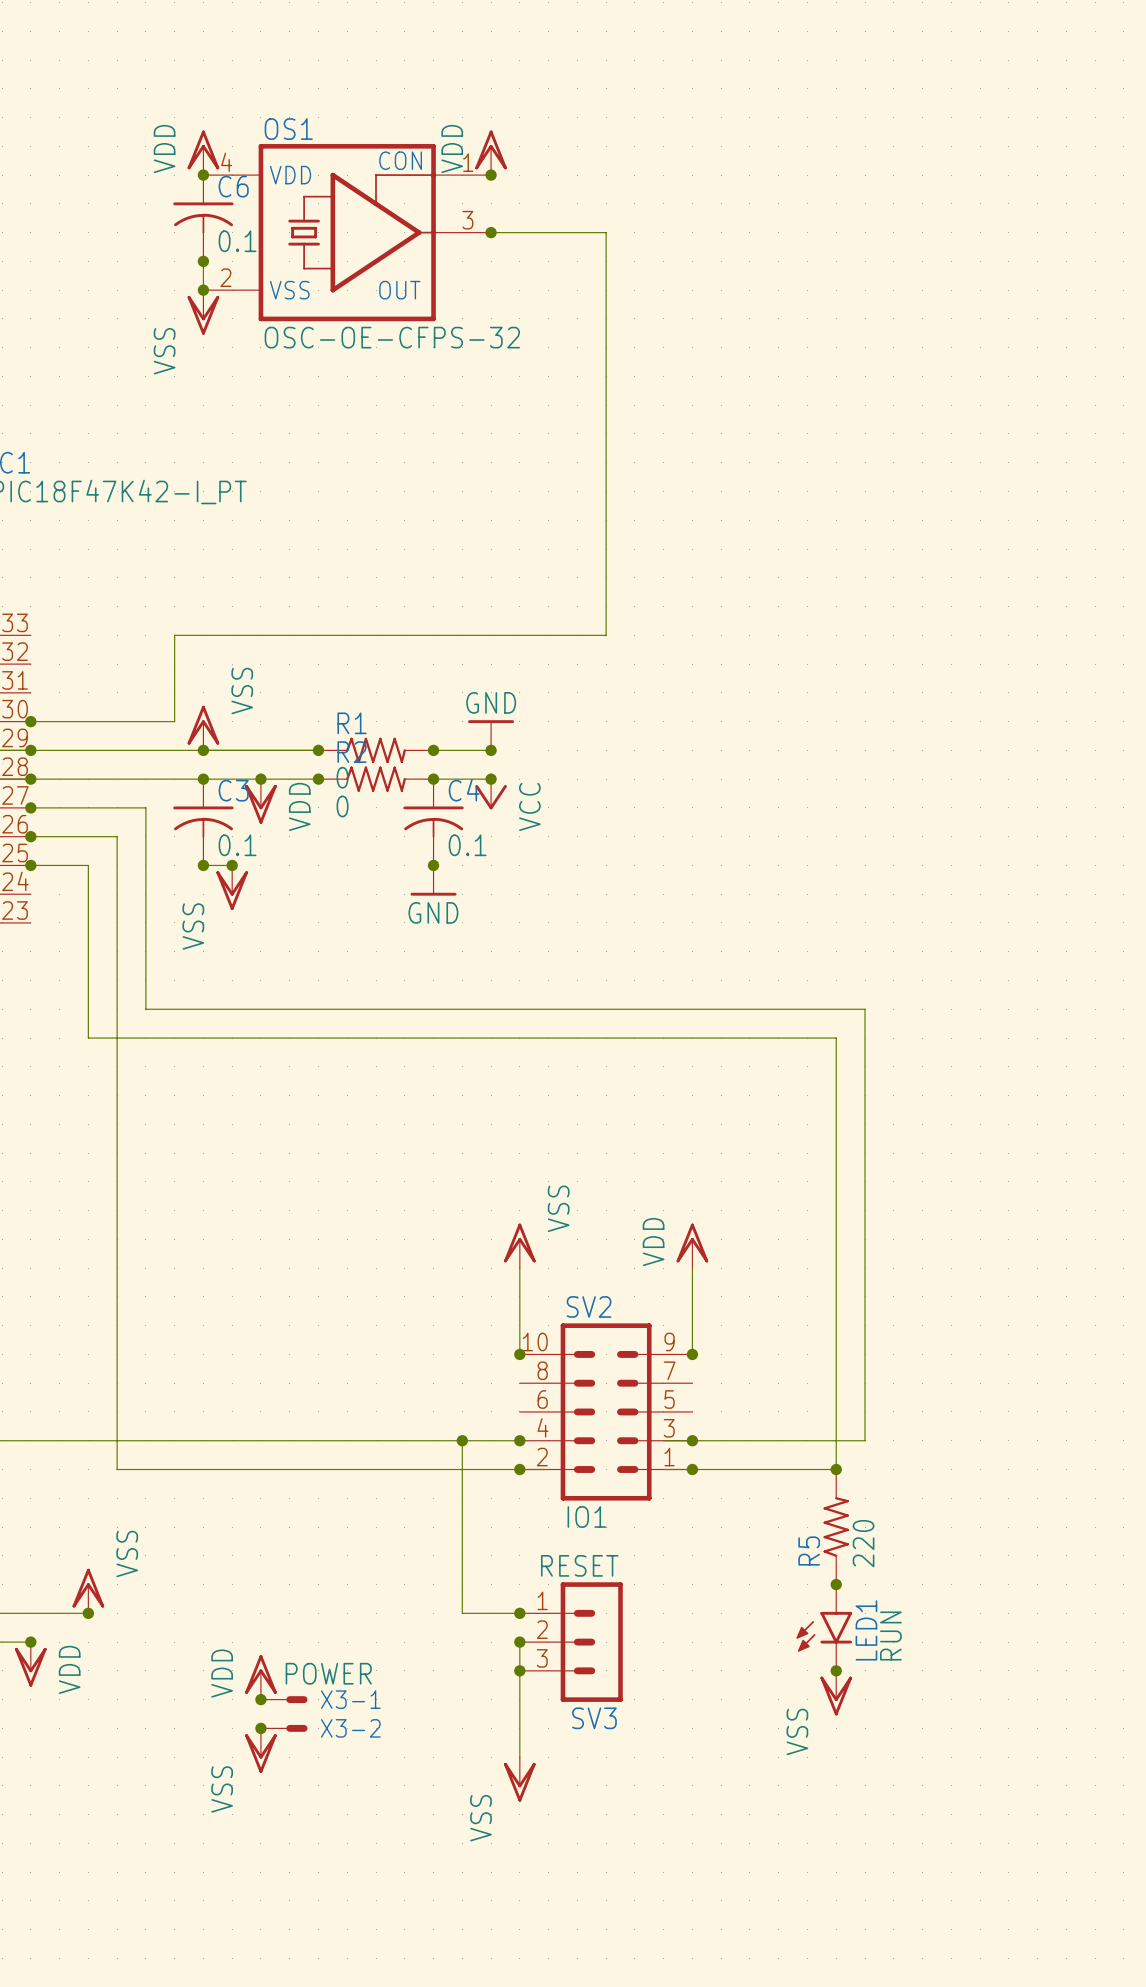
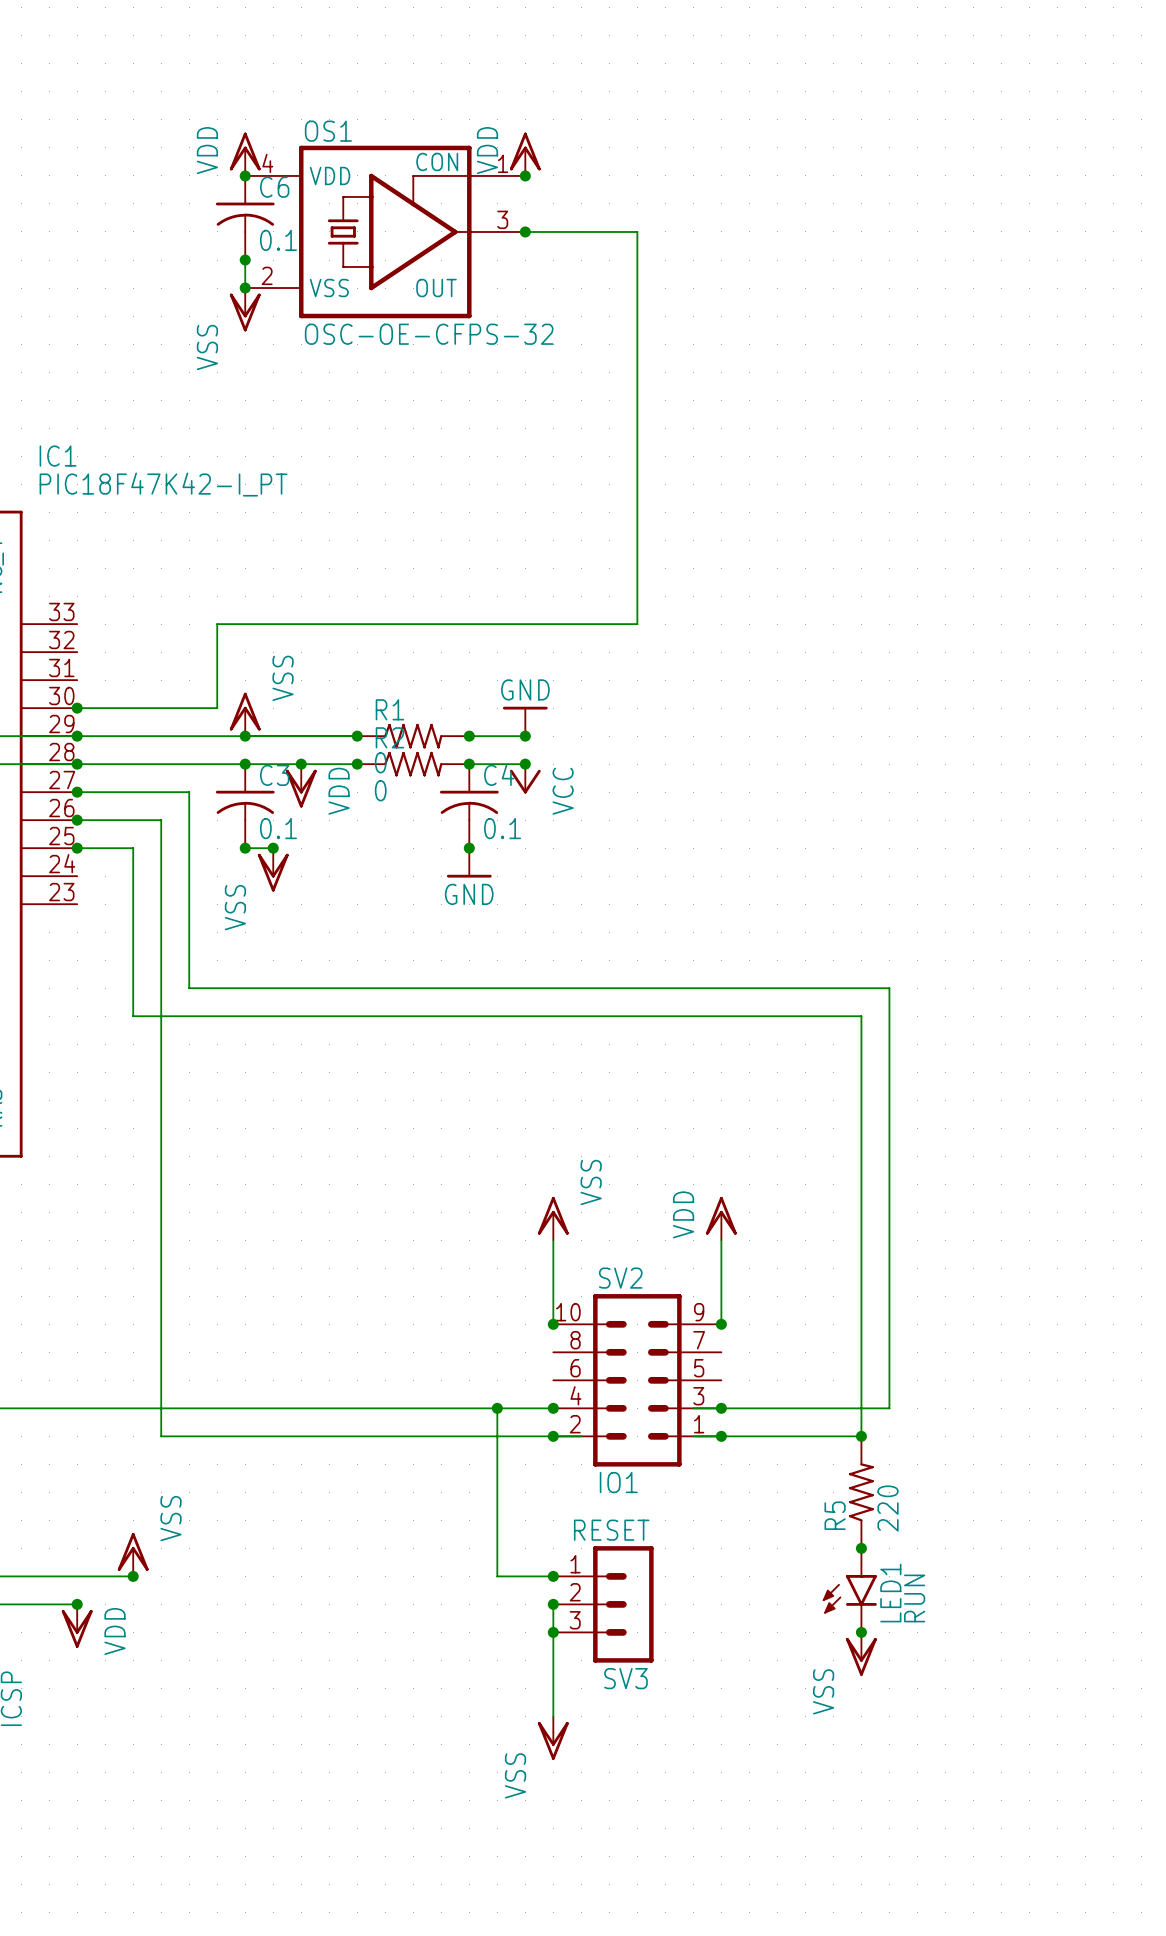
power symbol: VDD (260, 1677) -> none
junction: (260, 1699) -> none
X3-1: POWER (284, 1699) -> none
junction: (260, 1728) -> none
X3-2: (284, 1728) -> none
power symbol: VSS (260, 1750) -> none

